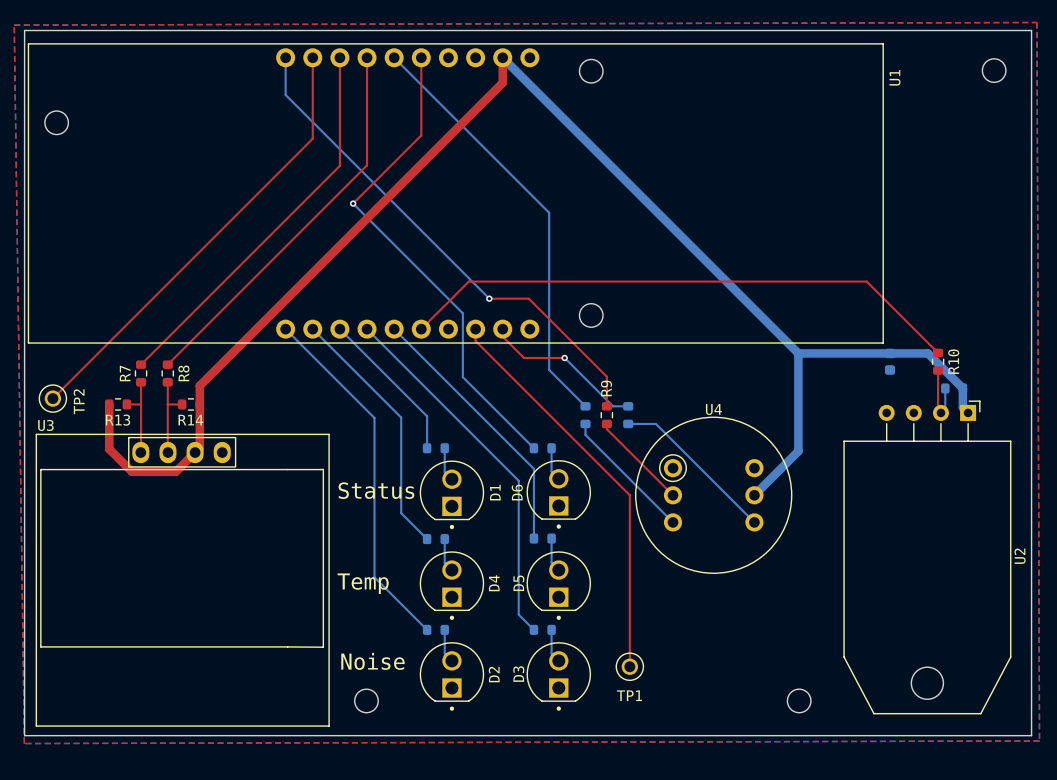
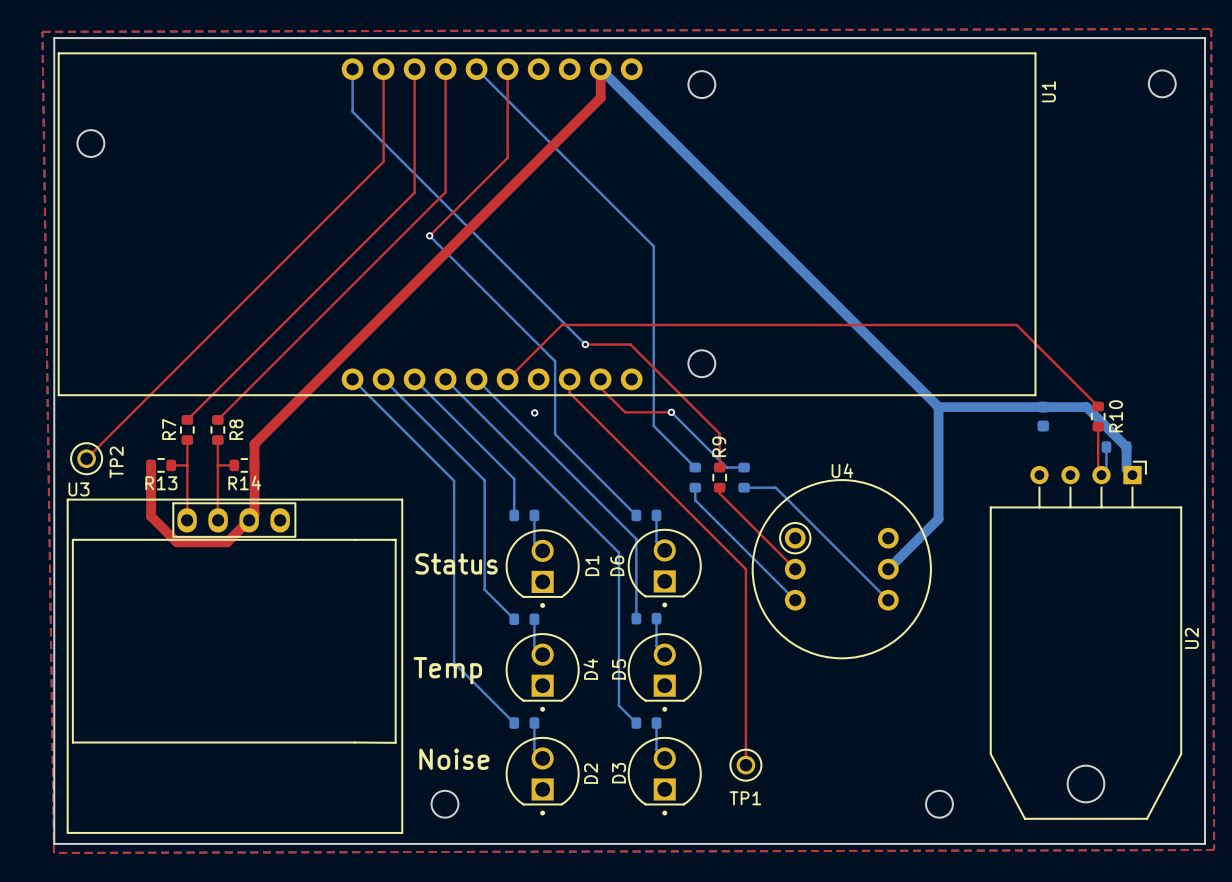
via: none -> (534, 412)

